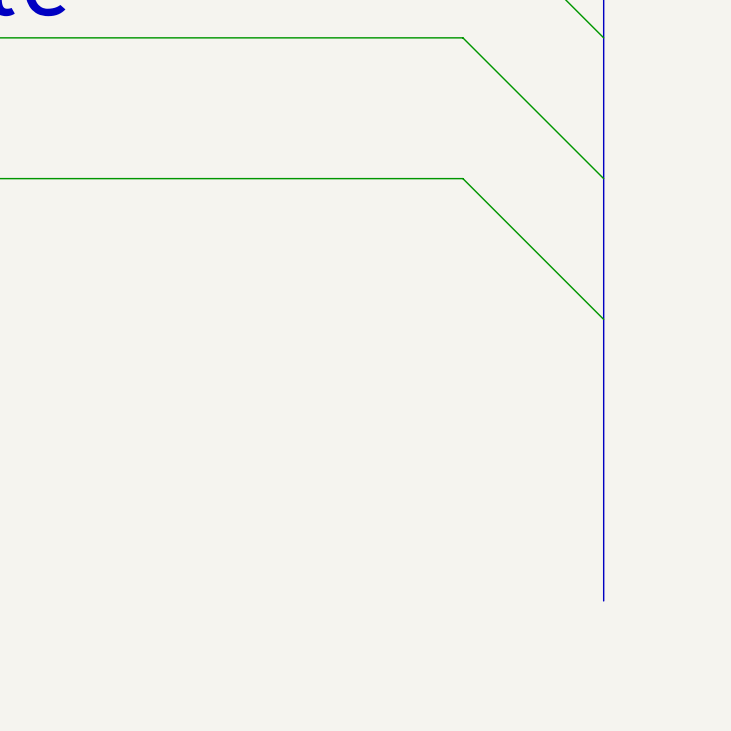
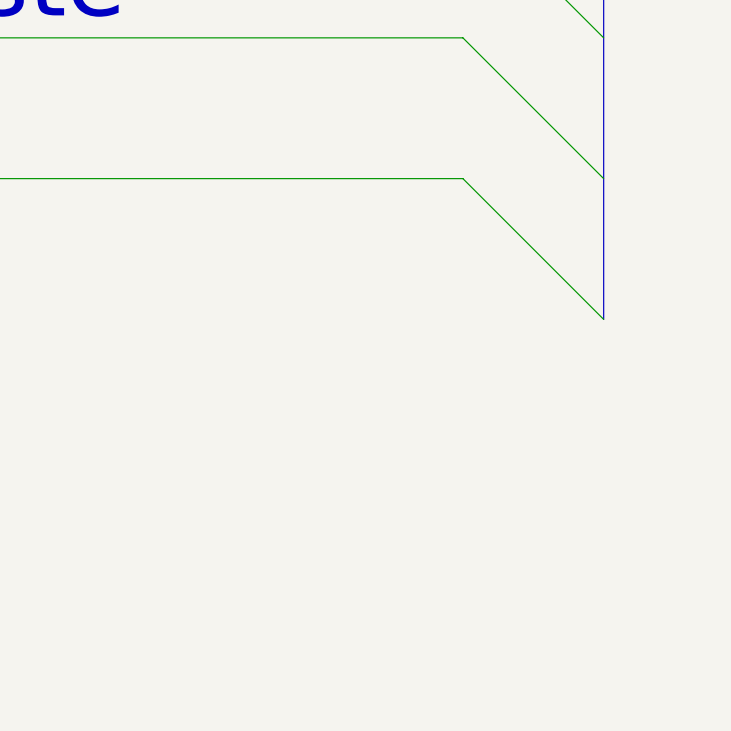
bus: (603, 319) (603, 600) -> none

